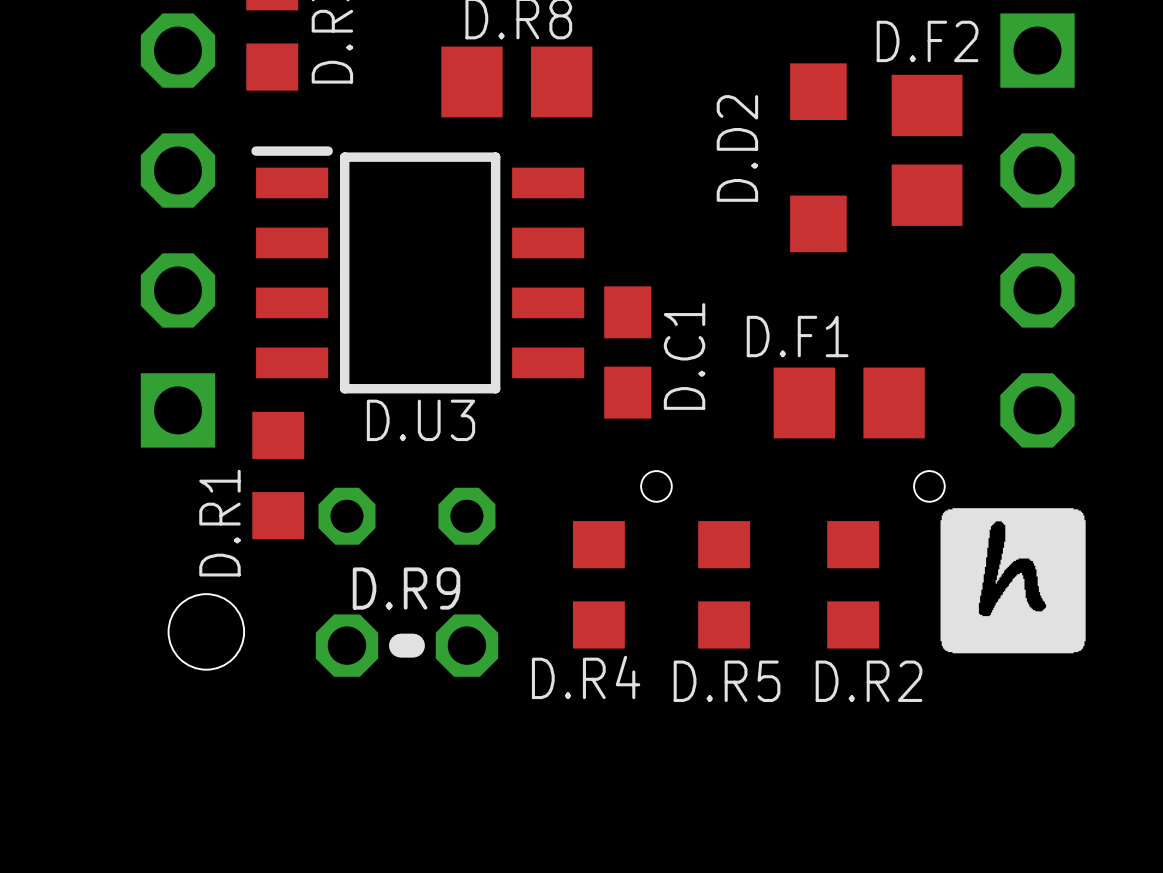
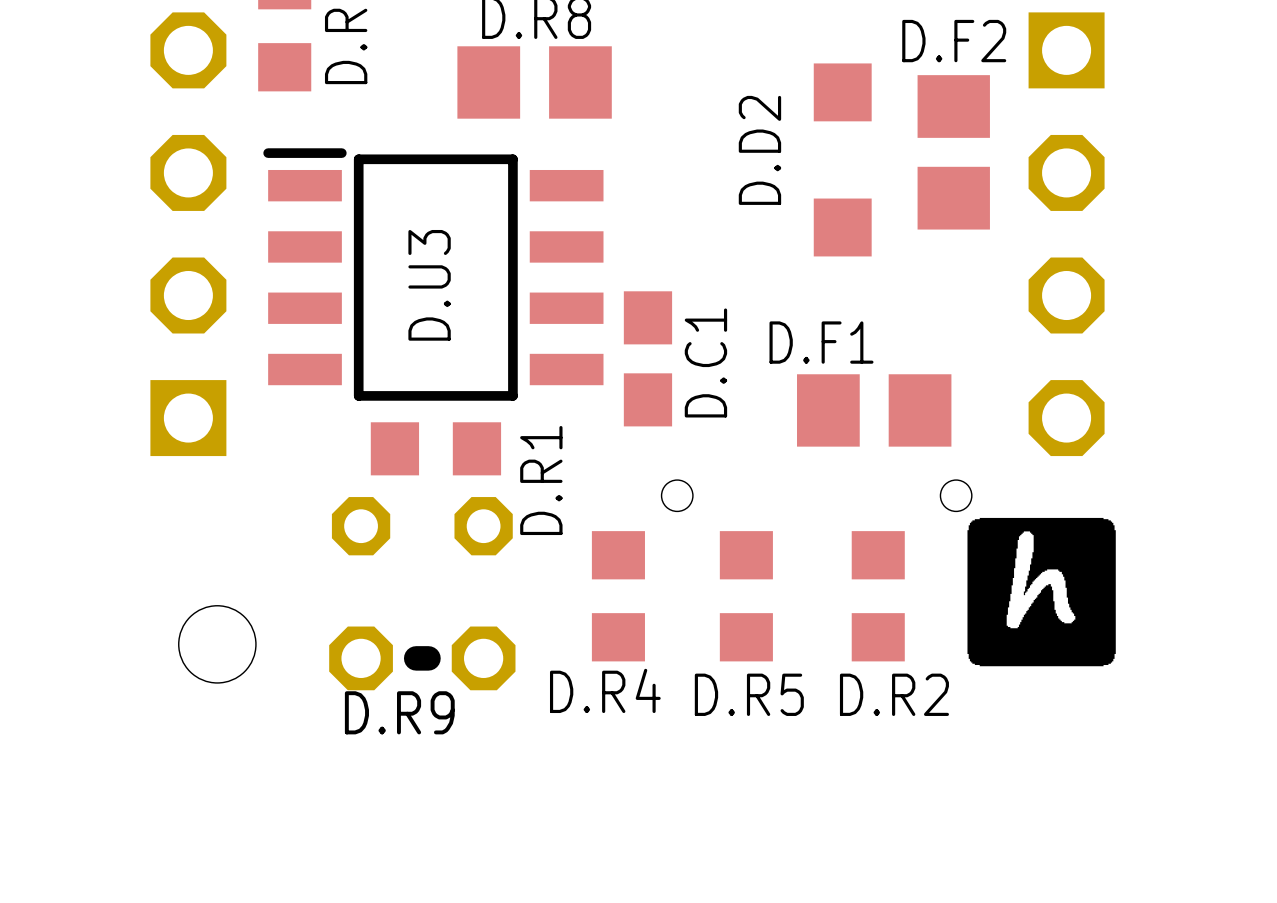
D.U3 name rotation: 0° (420, 420) -> 90° counterclockwise (429, 285)
D.R1 rotation: 0° (278, 475) -> 90° clockwise (435, 448)
D.R1 position: (278, 475) -> (435, 448)
D.R1 name position: D.R1 (219, 523) -> D.R1 (541, 480)
D.R9 name position: D.R9 (406, 588) -> D.R9 (399, 712)

